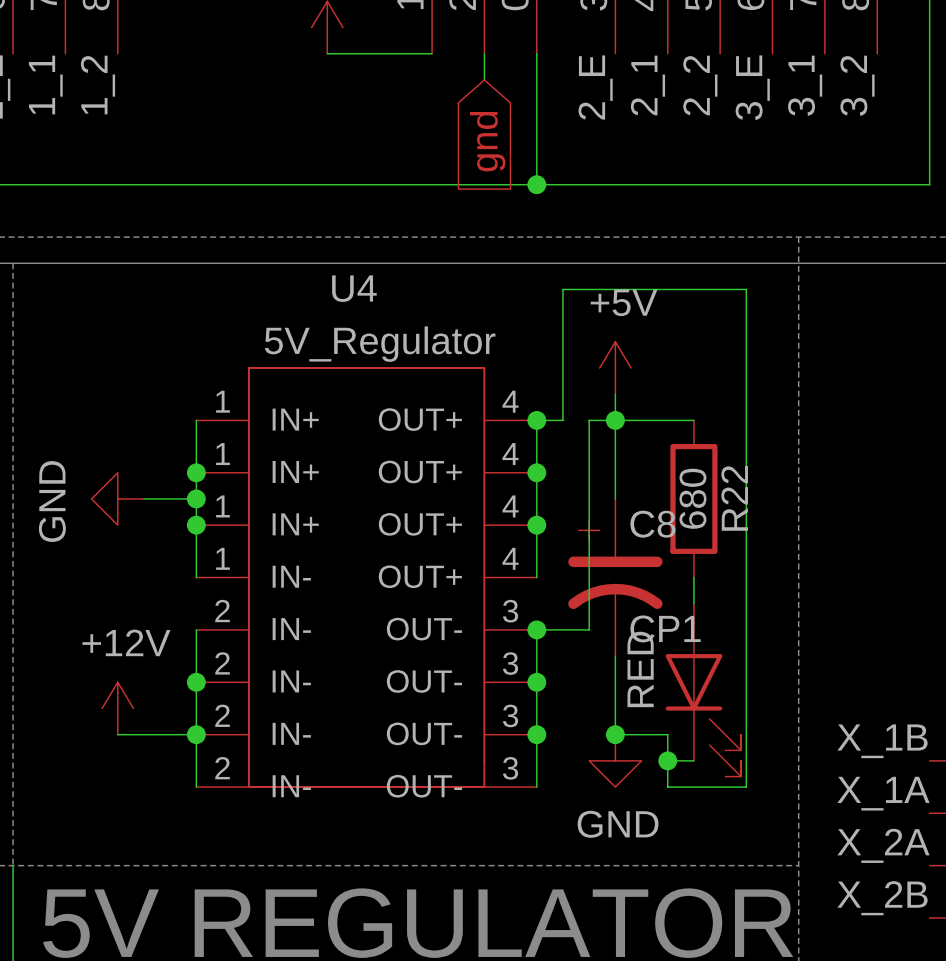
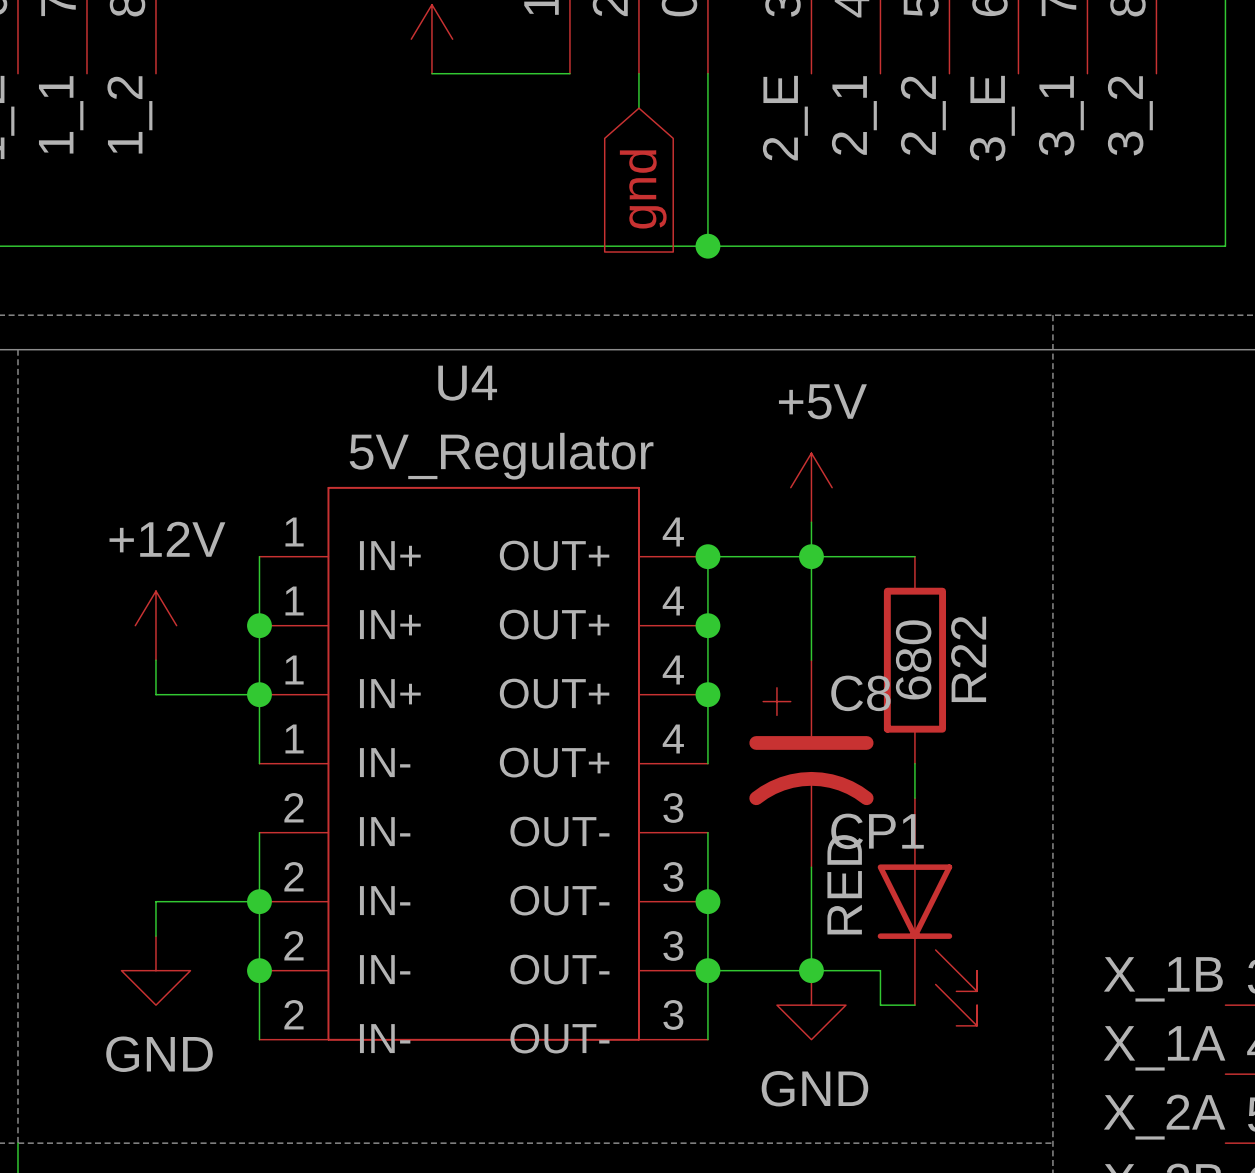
wire: (563, 420) (563, 289) (746, 289) (746, 787) (667, 787) (667, 760) -> none
wire: (589, 420) (589, 629) (536, 629) -> (776, 556) (742, 556)
wire: none -> (155, 660) (155, 694) (259, 694)
power symbol rotation: 0° (117, 498) -> 90° counterclockwise (155, 970)
power symbol position: GND (117, 498) -> GND (155, 970)
wire: (143, 498) (196, 498) -> none
junction: (196, 498) -> none
junction: (536, 629) -> none
wire: none -> (259, 901) (155, 901) (155, 936)
power symbol position: +12V (117, 708) -> +12V (155, 625)
wire: (117, 734) (196, 734) -> (707, 970) (811, 970)
junction: (667, 760) -> none

